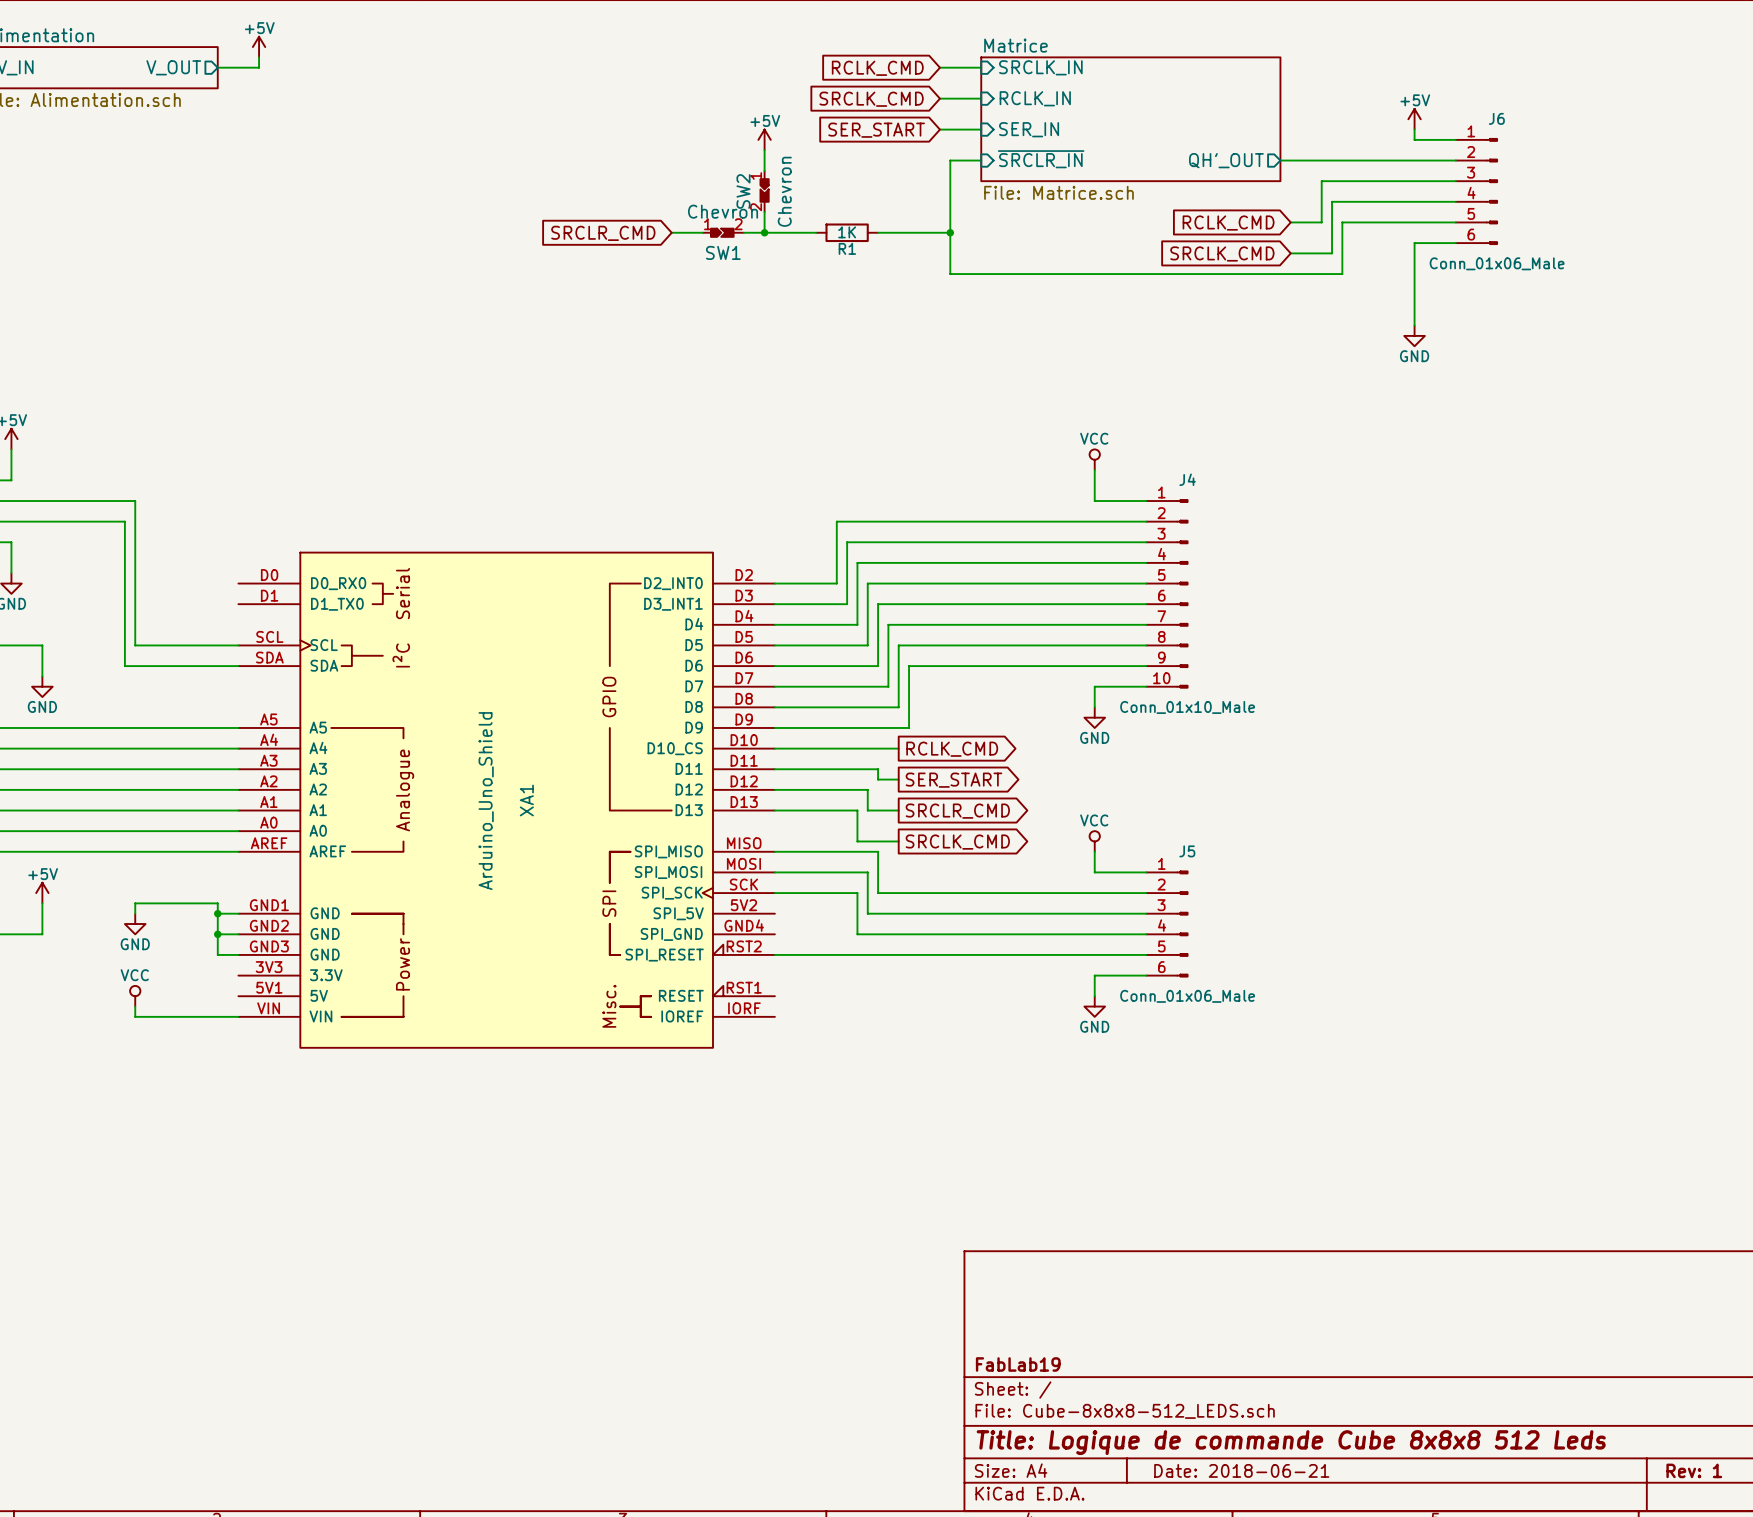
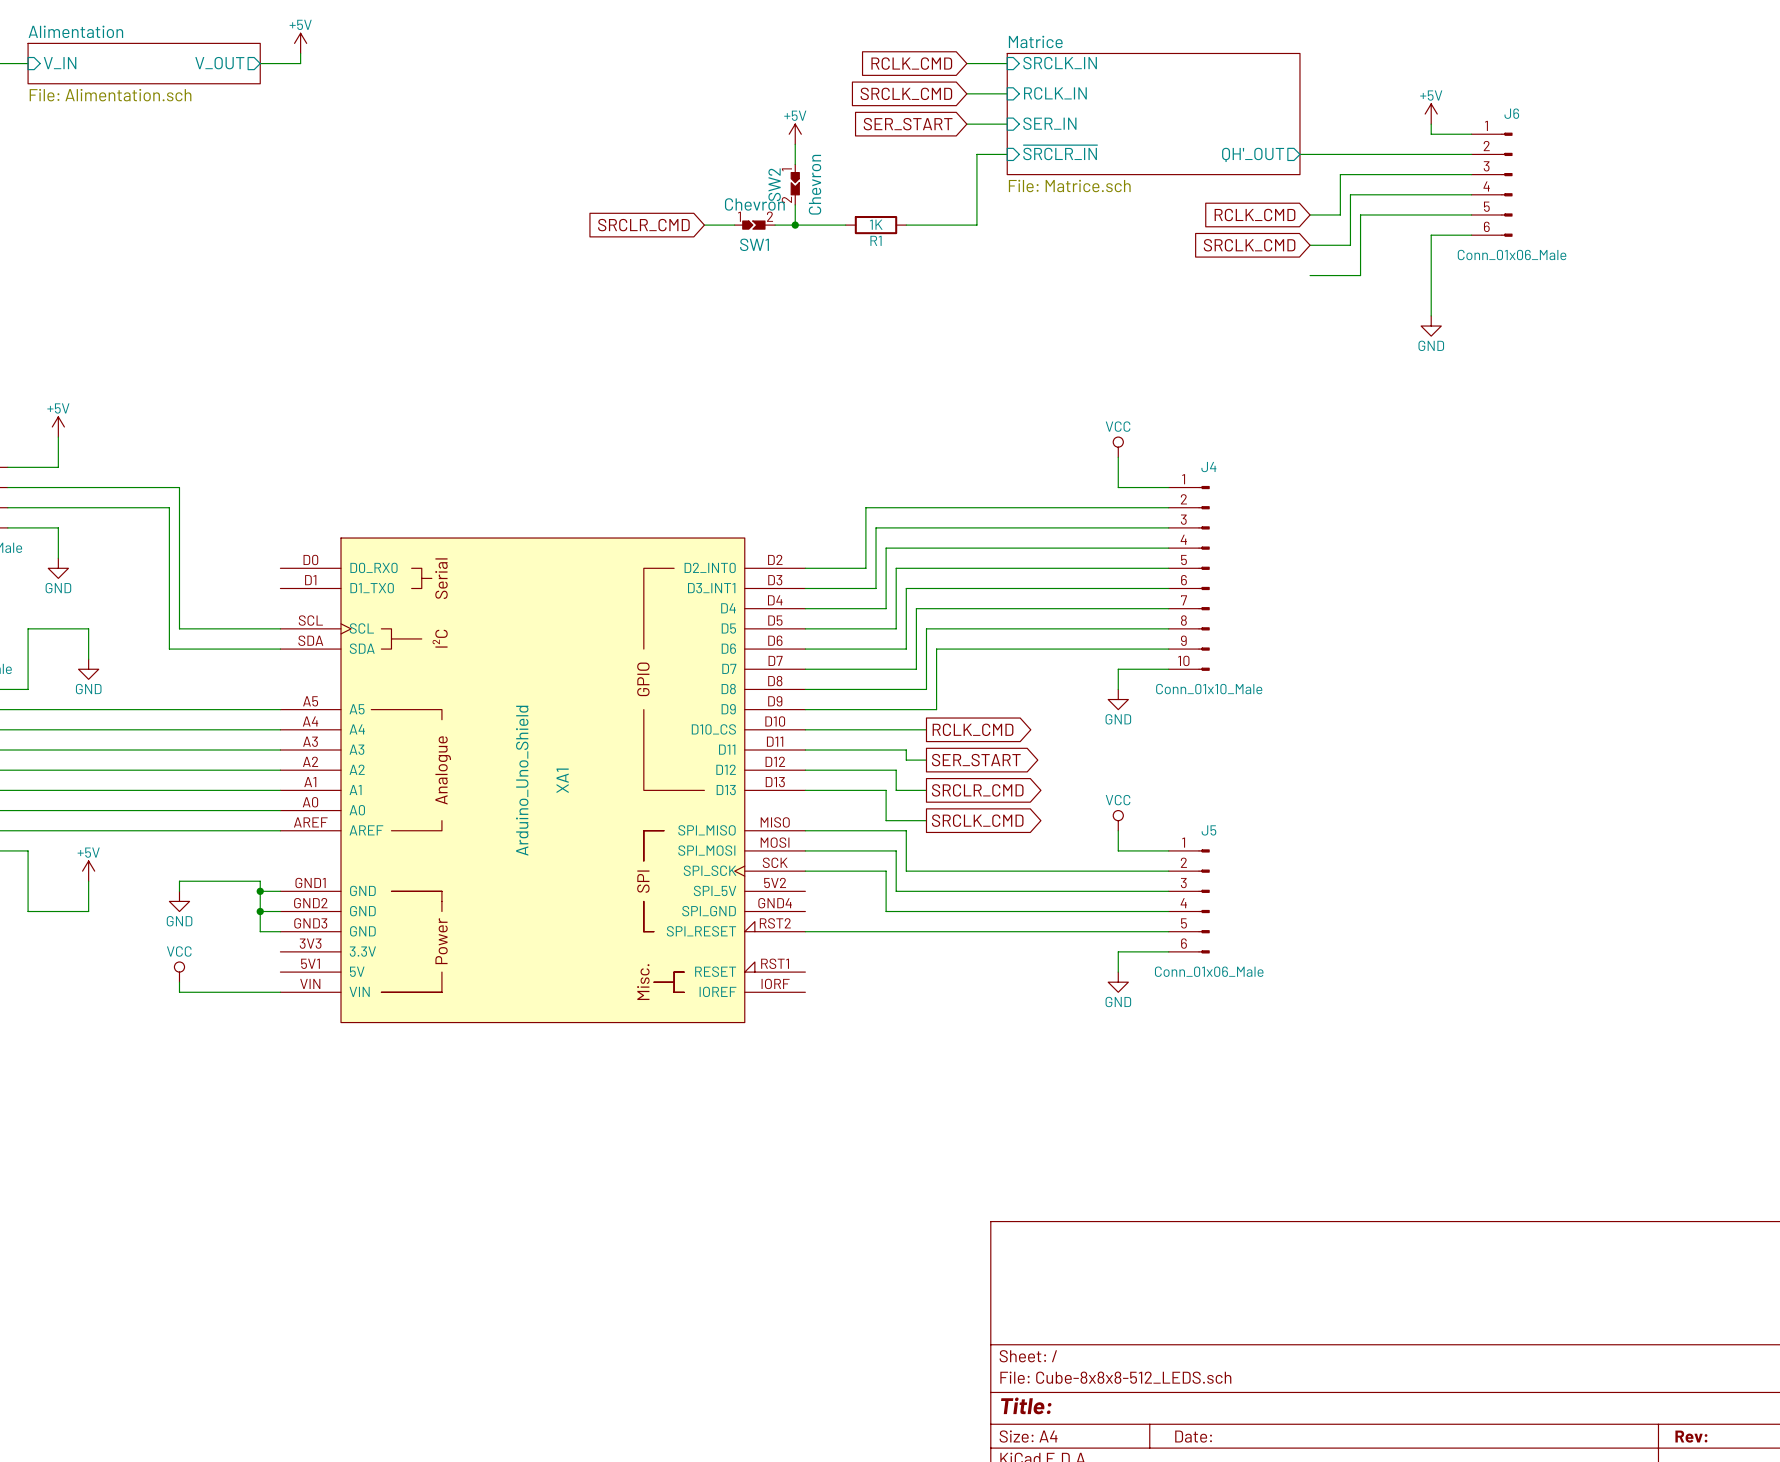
wire: (950, 232) (950, 274) (1342, 274) -> (1310, 275) (1360, 275) (1360, 265)
junction: (950, 232) -> none
title block: FabLab19 (1018, 1364) -> none
title block: Title: Logique de commande Cube 8x8x8 512 Leds (1291, 1442) -> Title: (1026, 1405)
title block: Date: 2018-06-21 (1241, 1470) -> Date: (1193, 1436)
title block: Rev: 1 (1694, 1470) -> Rev: (1691, 1436)

